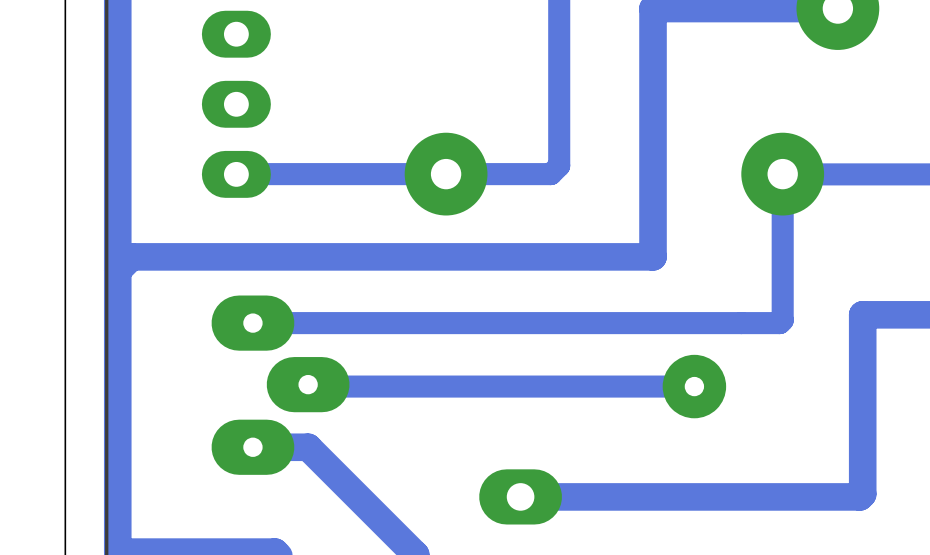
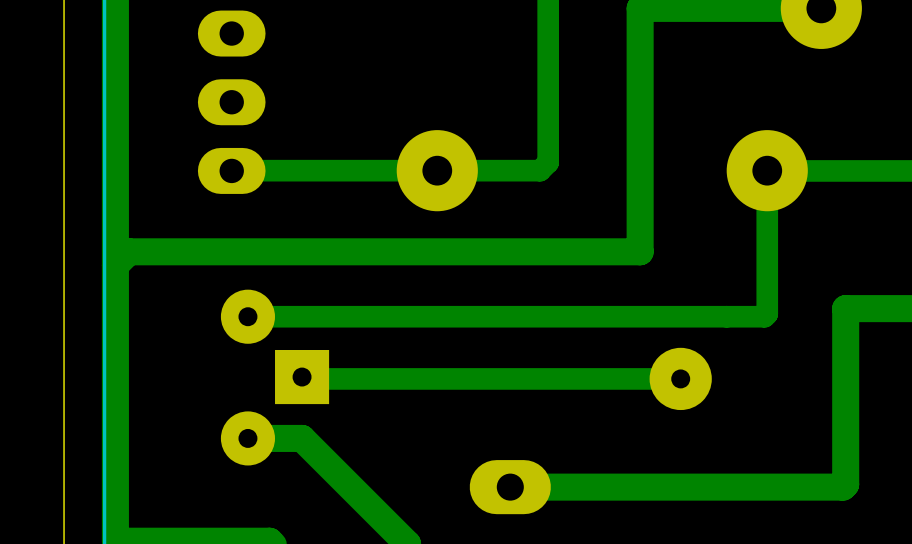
part footprint: [211, 295, 350, 475] -> [220, 289, 330, 466]

